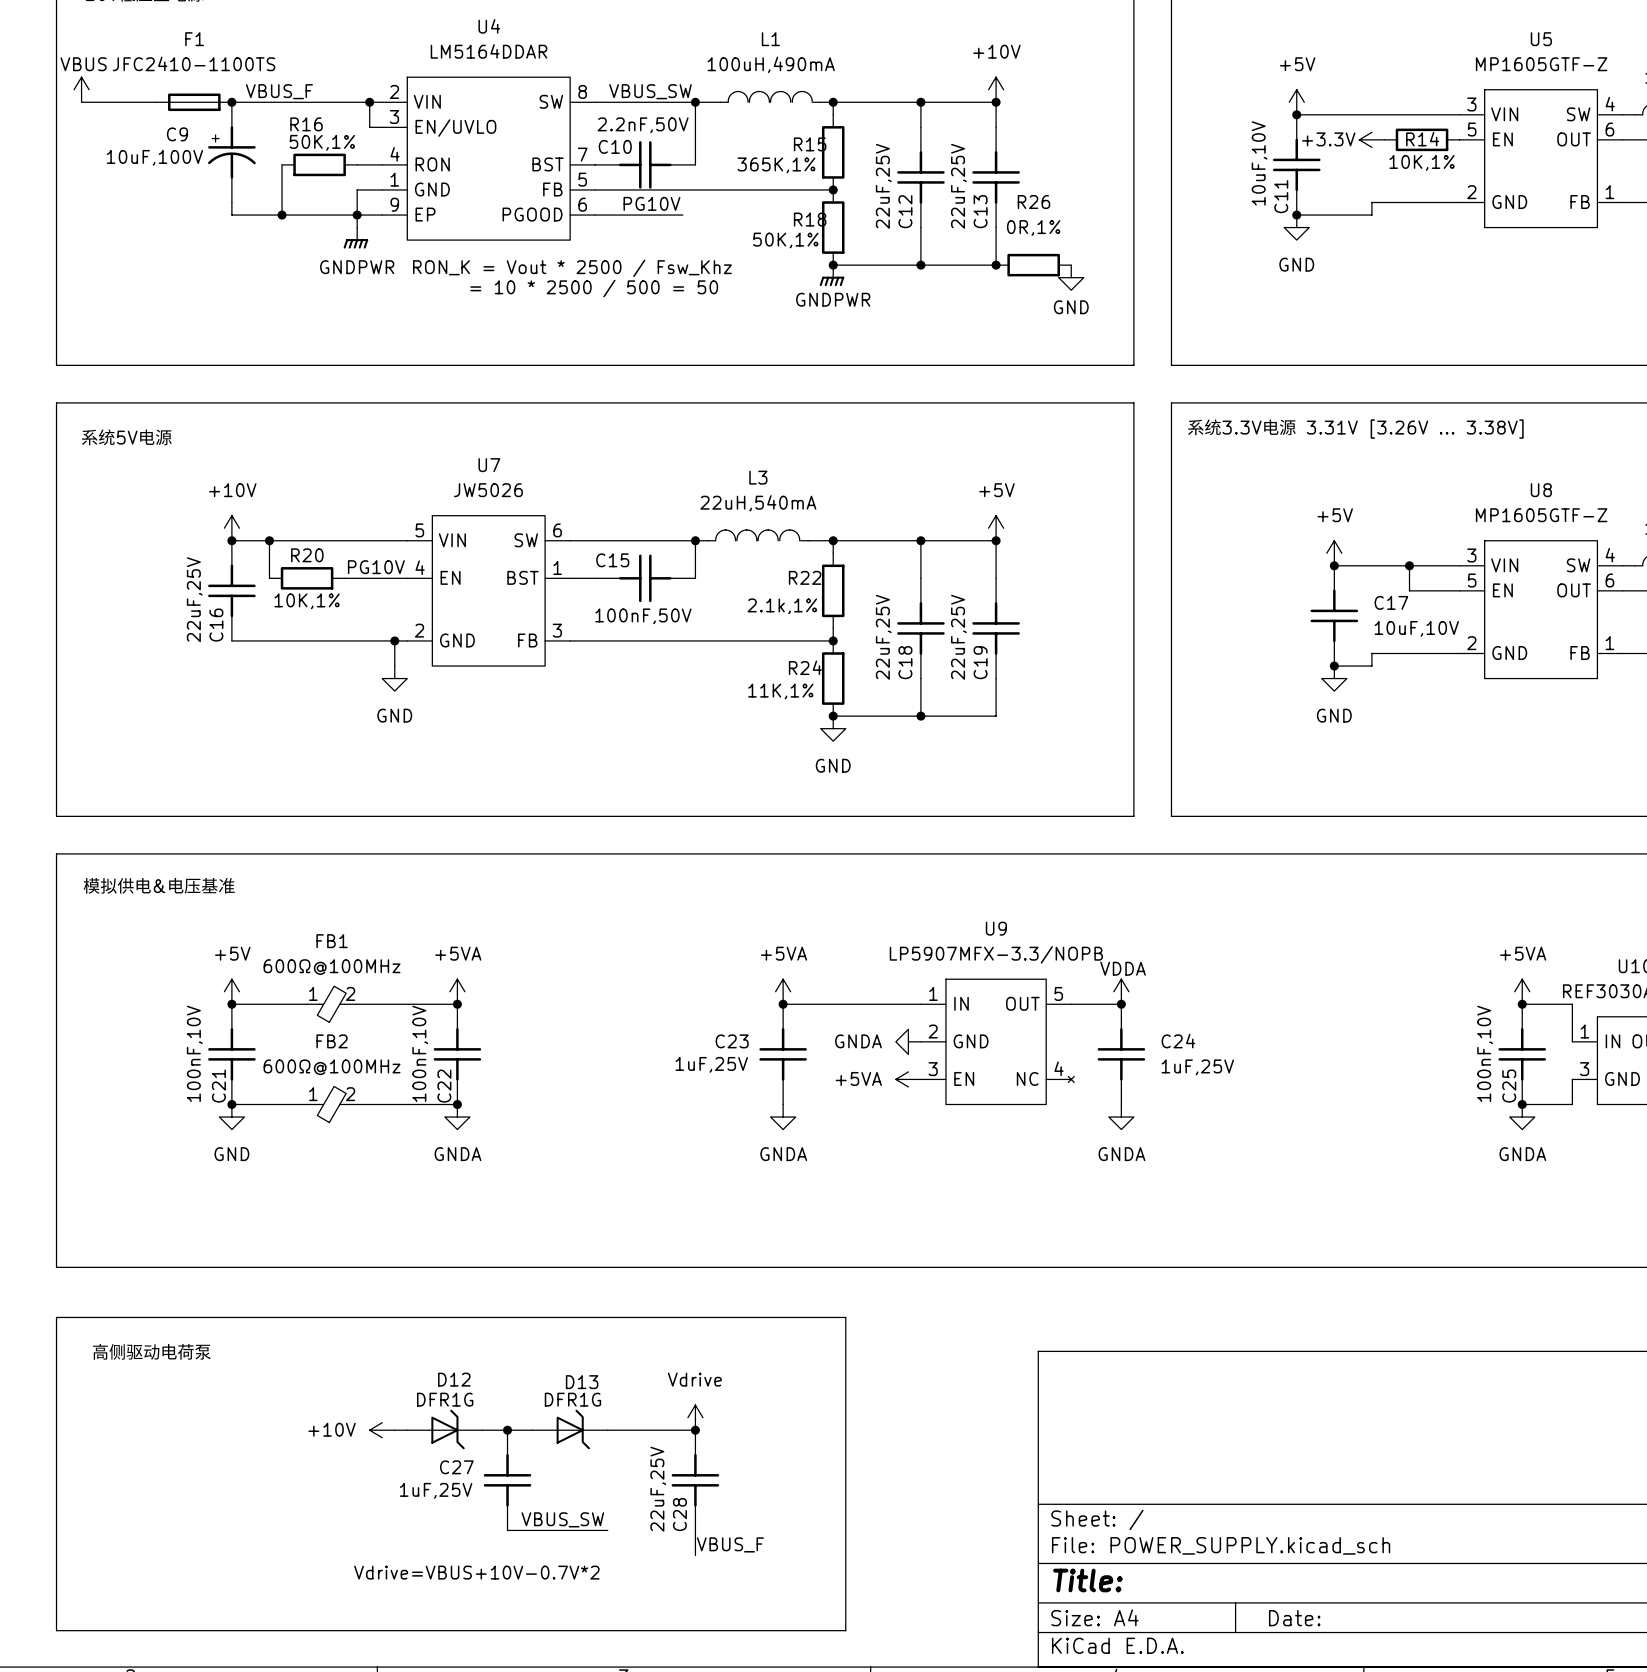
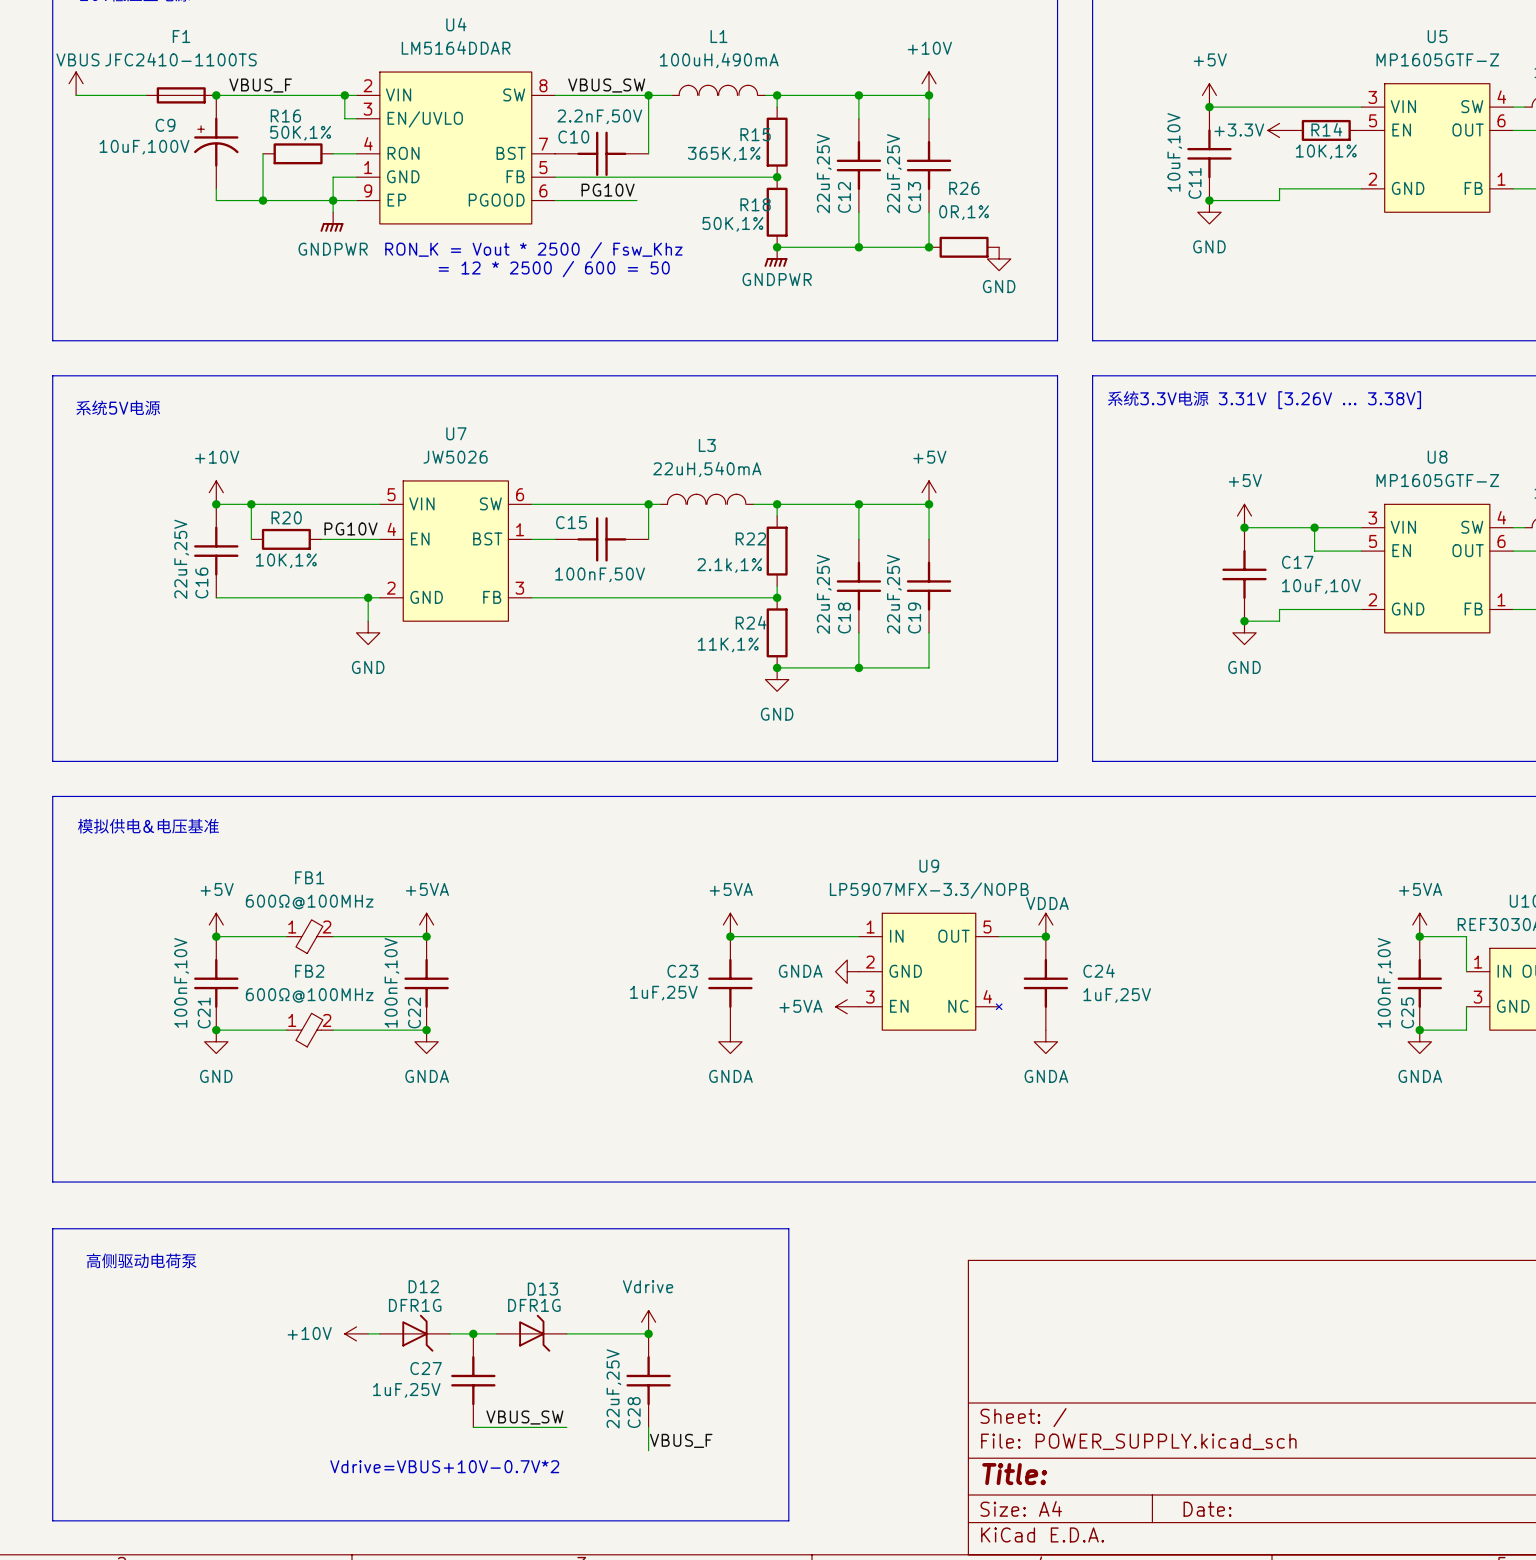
text: = 10 * 2500 / 500 = 50 (594, 288) -> = 12 * 2500 / 600 = 50 (554, 269)

